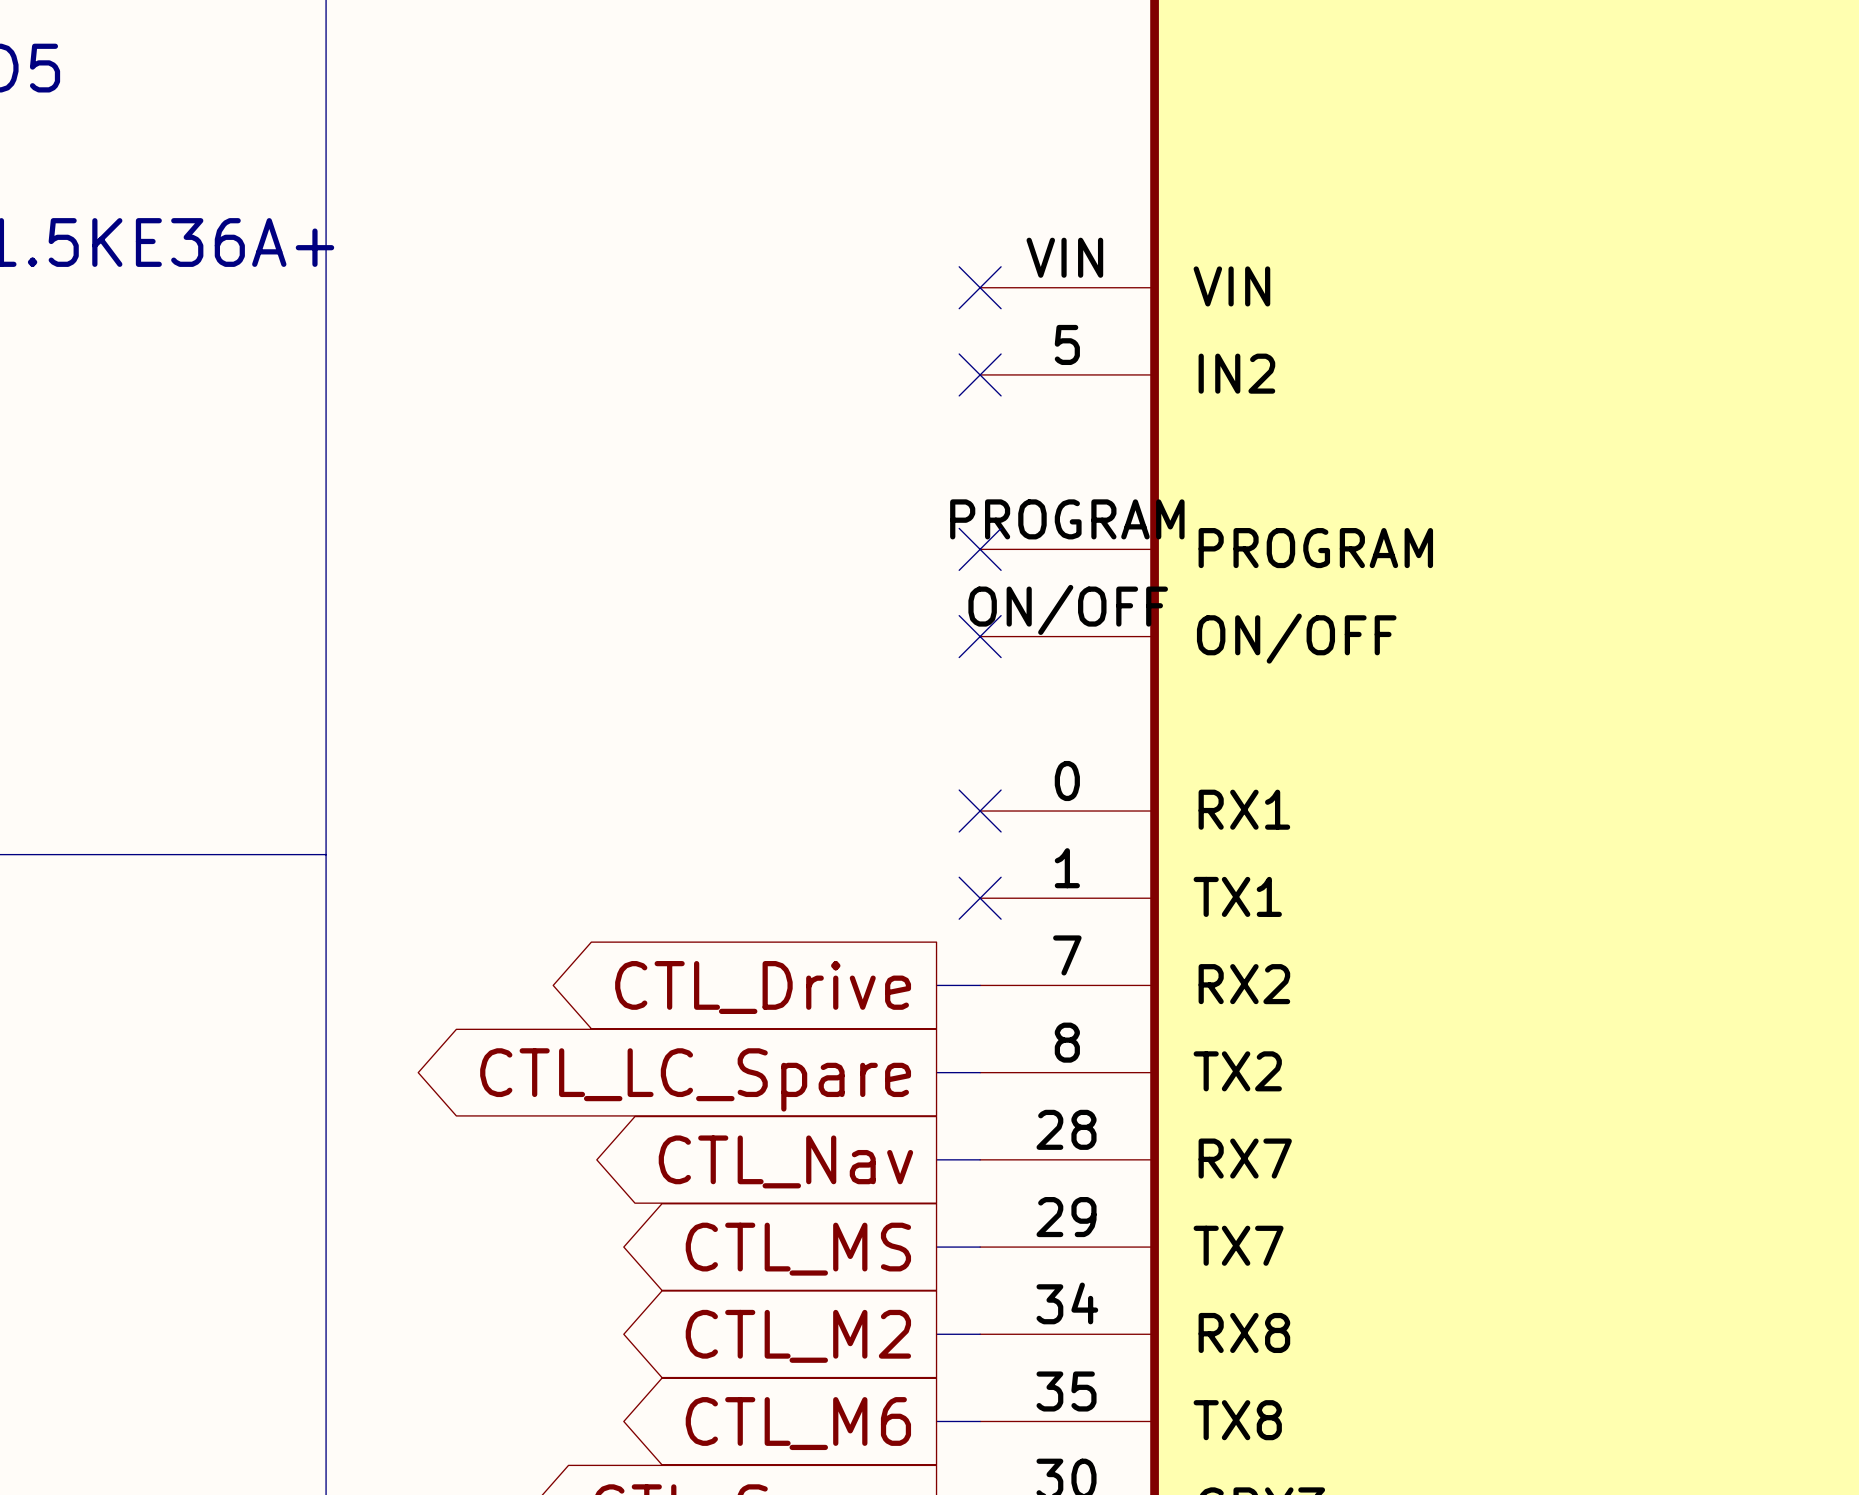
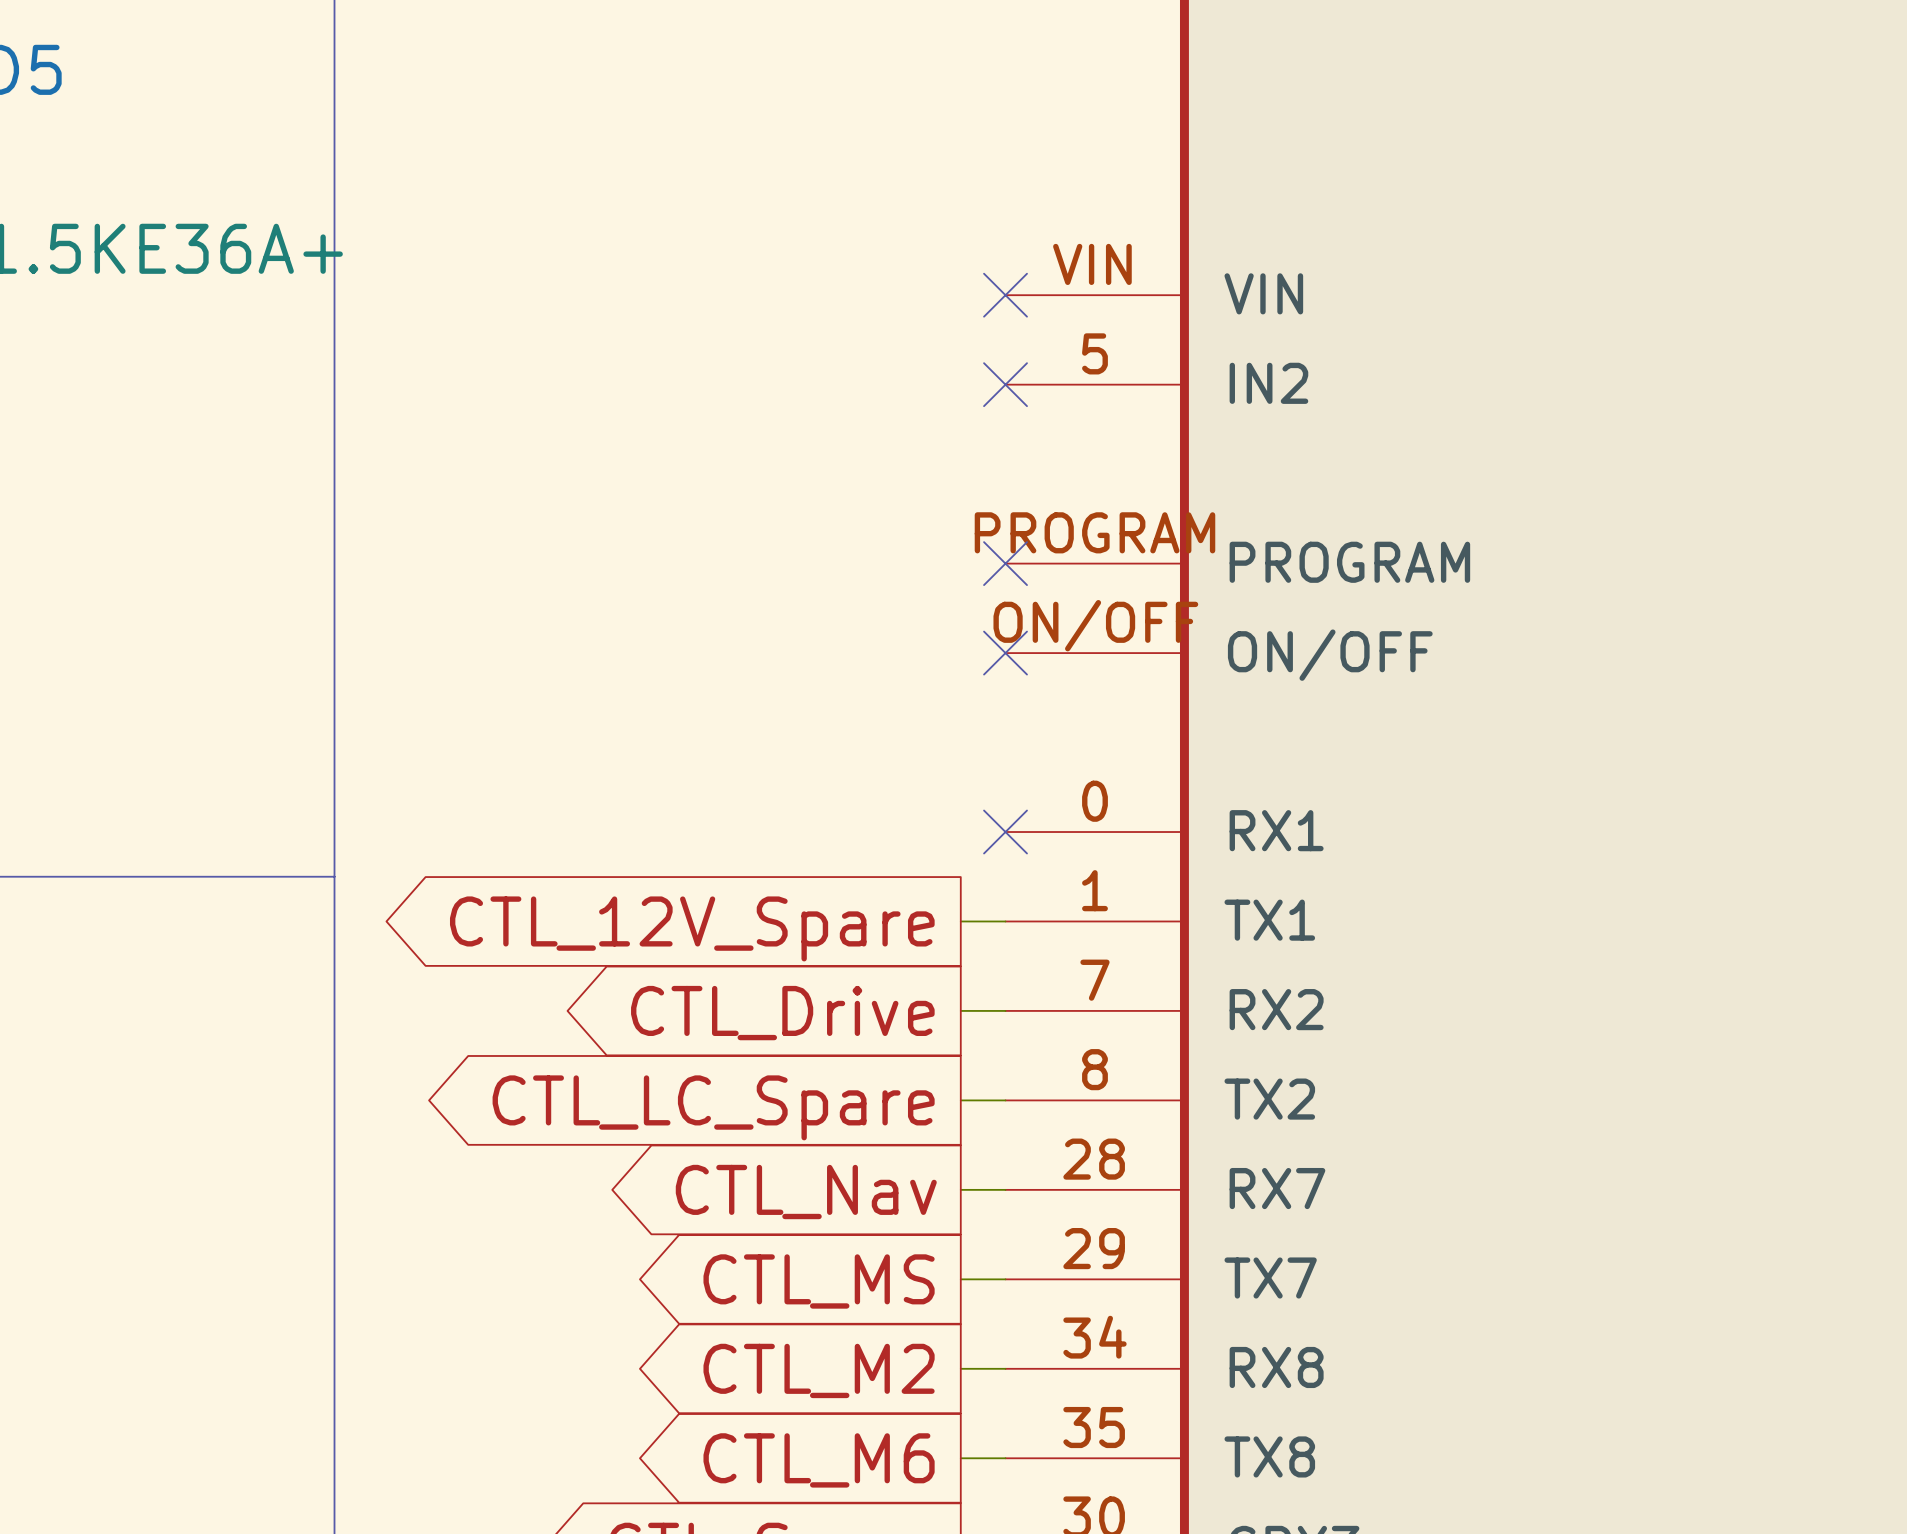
wire: none -> (960, 921) (1005, 921)
no-connect mark: (980, 898) -> none
global label: none -> CTL_12V_Spare (692, 928)

